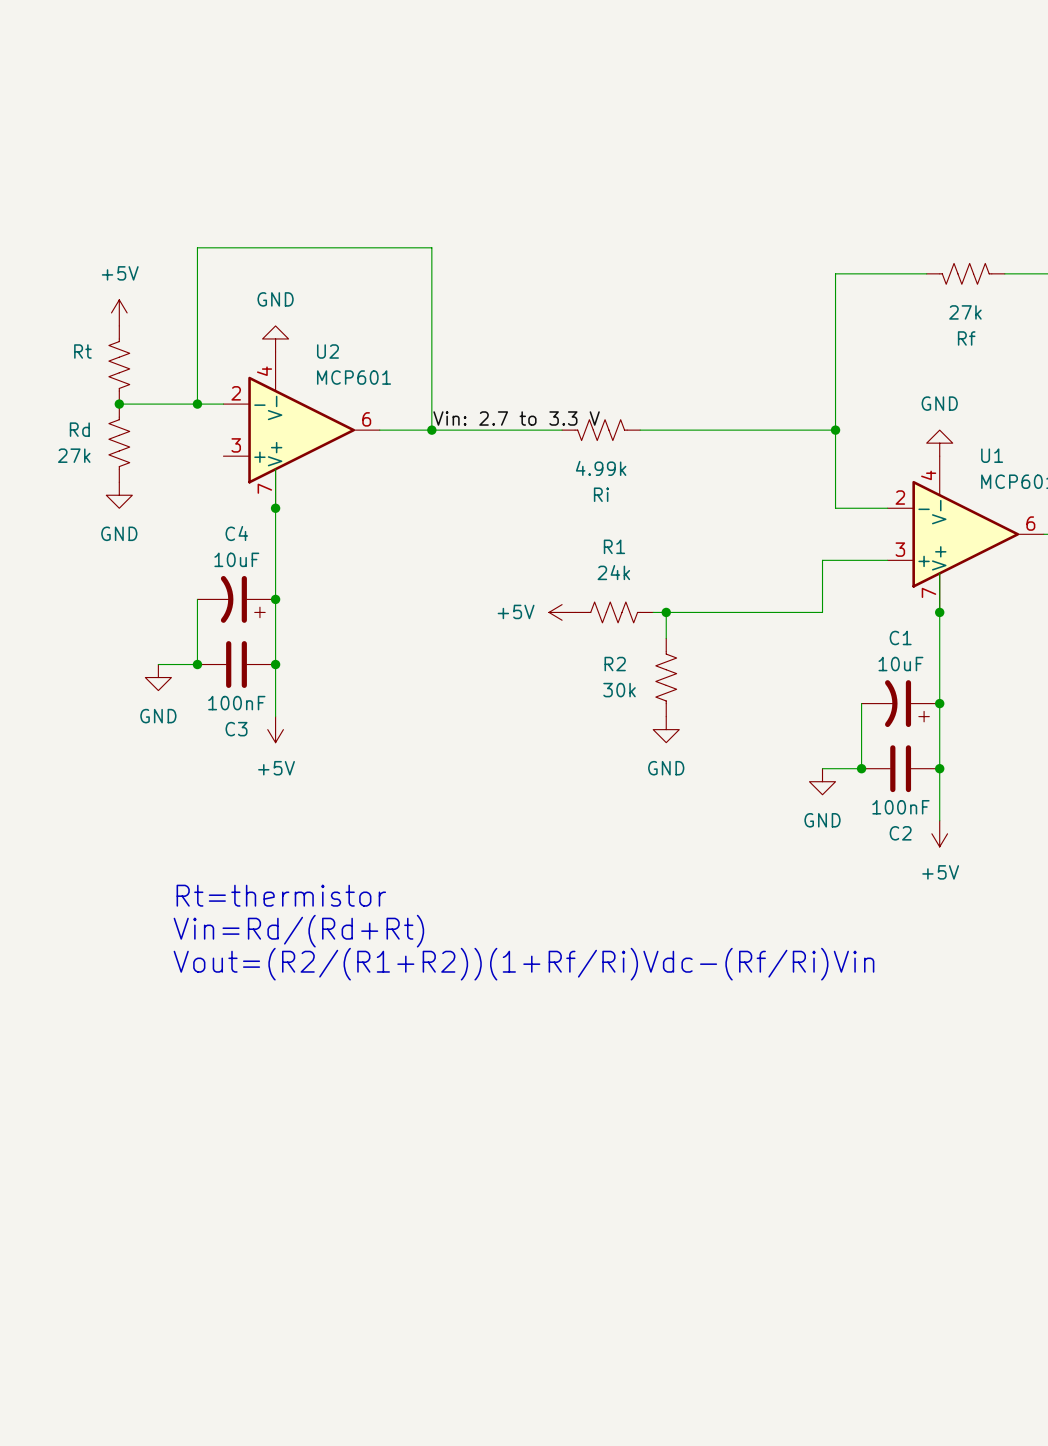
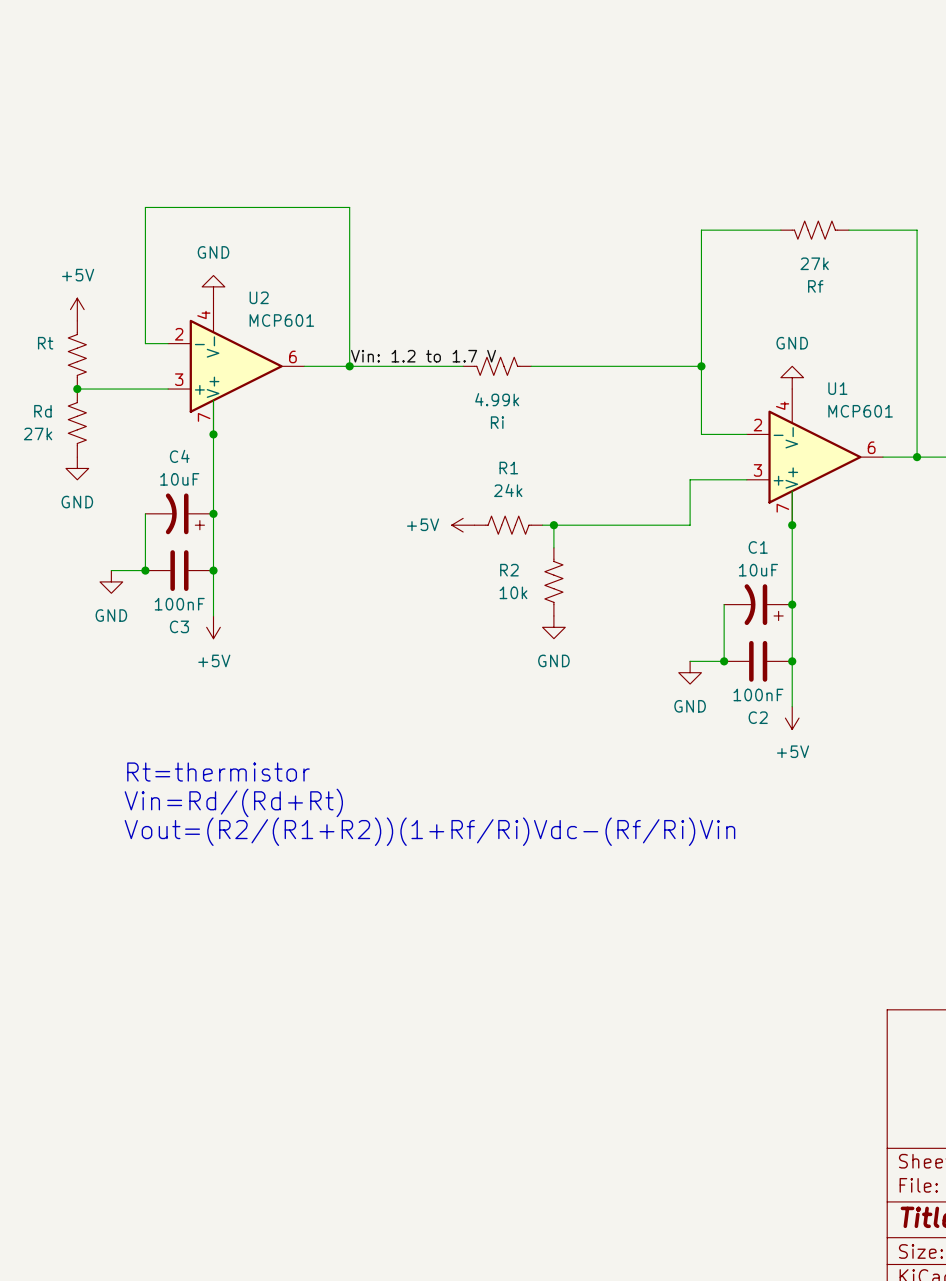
power symbol position: +5V (119, 312) -> +5V (77, 309)
Rt position: (119, 365) -> (77, 354)
wire: (119, 404) (197, 404) -> none
junction: (119, 404) -> none
junction: (197, 404) -> none
label: Vin: 2.7 to 3.3 V (516, 418) -> Vin: 1.2 to 1.7 V (423, 356)
Rd position: (119, 443) -> (77, 423)
wire: none -> (77, 389) (168, 389)
junction: none -> (77, 389)
power symbol position: GND (119, 495) -> GND (77, 468)
R2 value: 30k (619, 690) -> 10k (513, 592)

